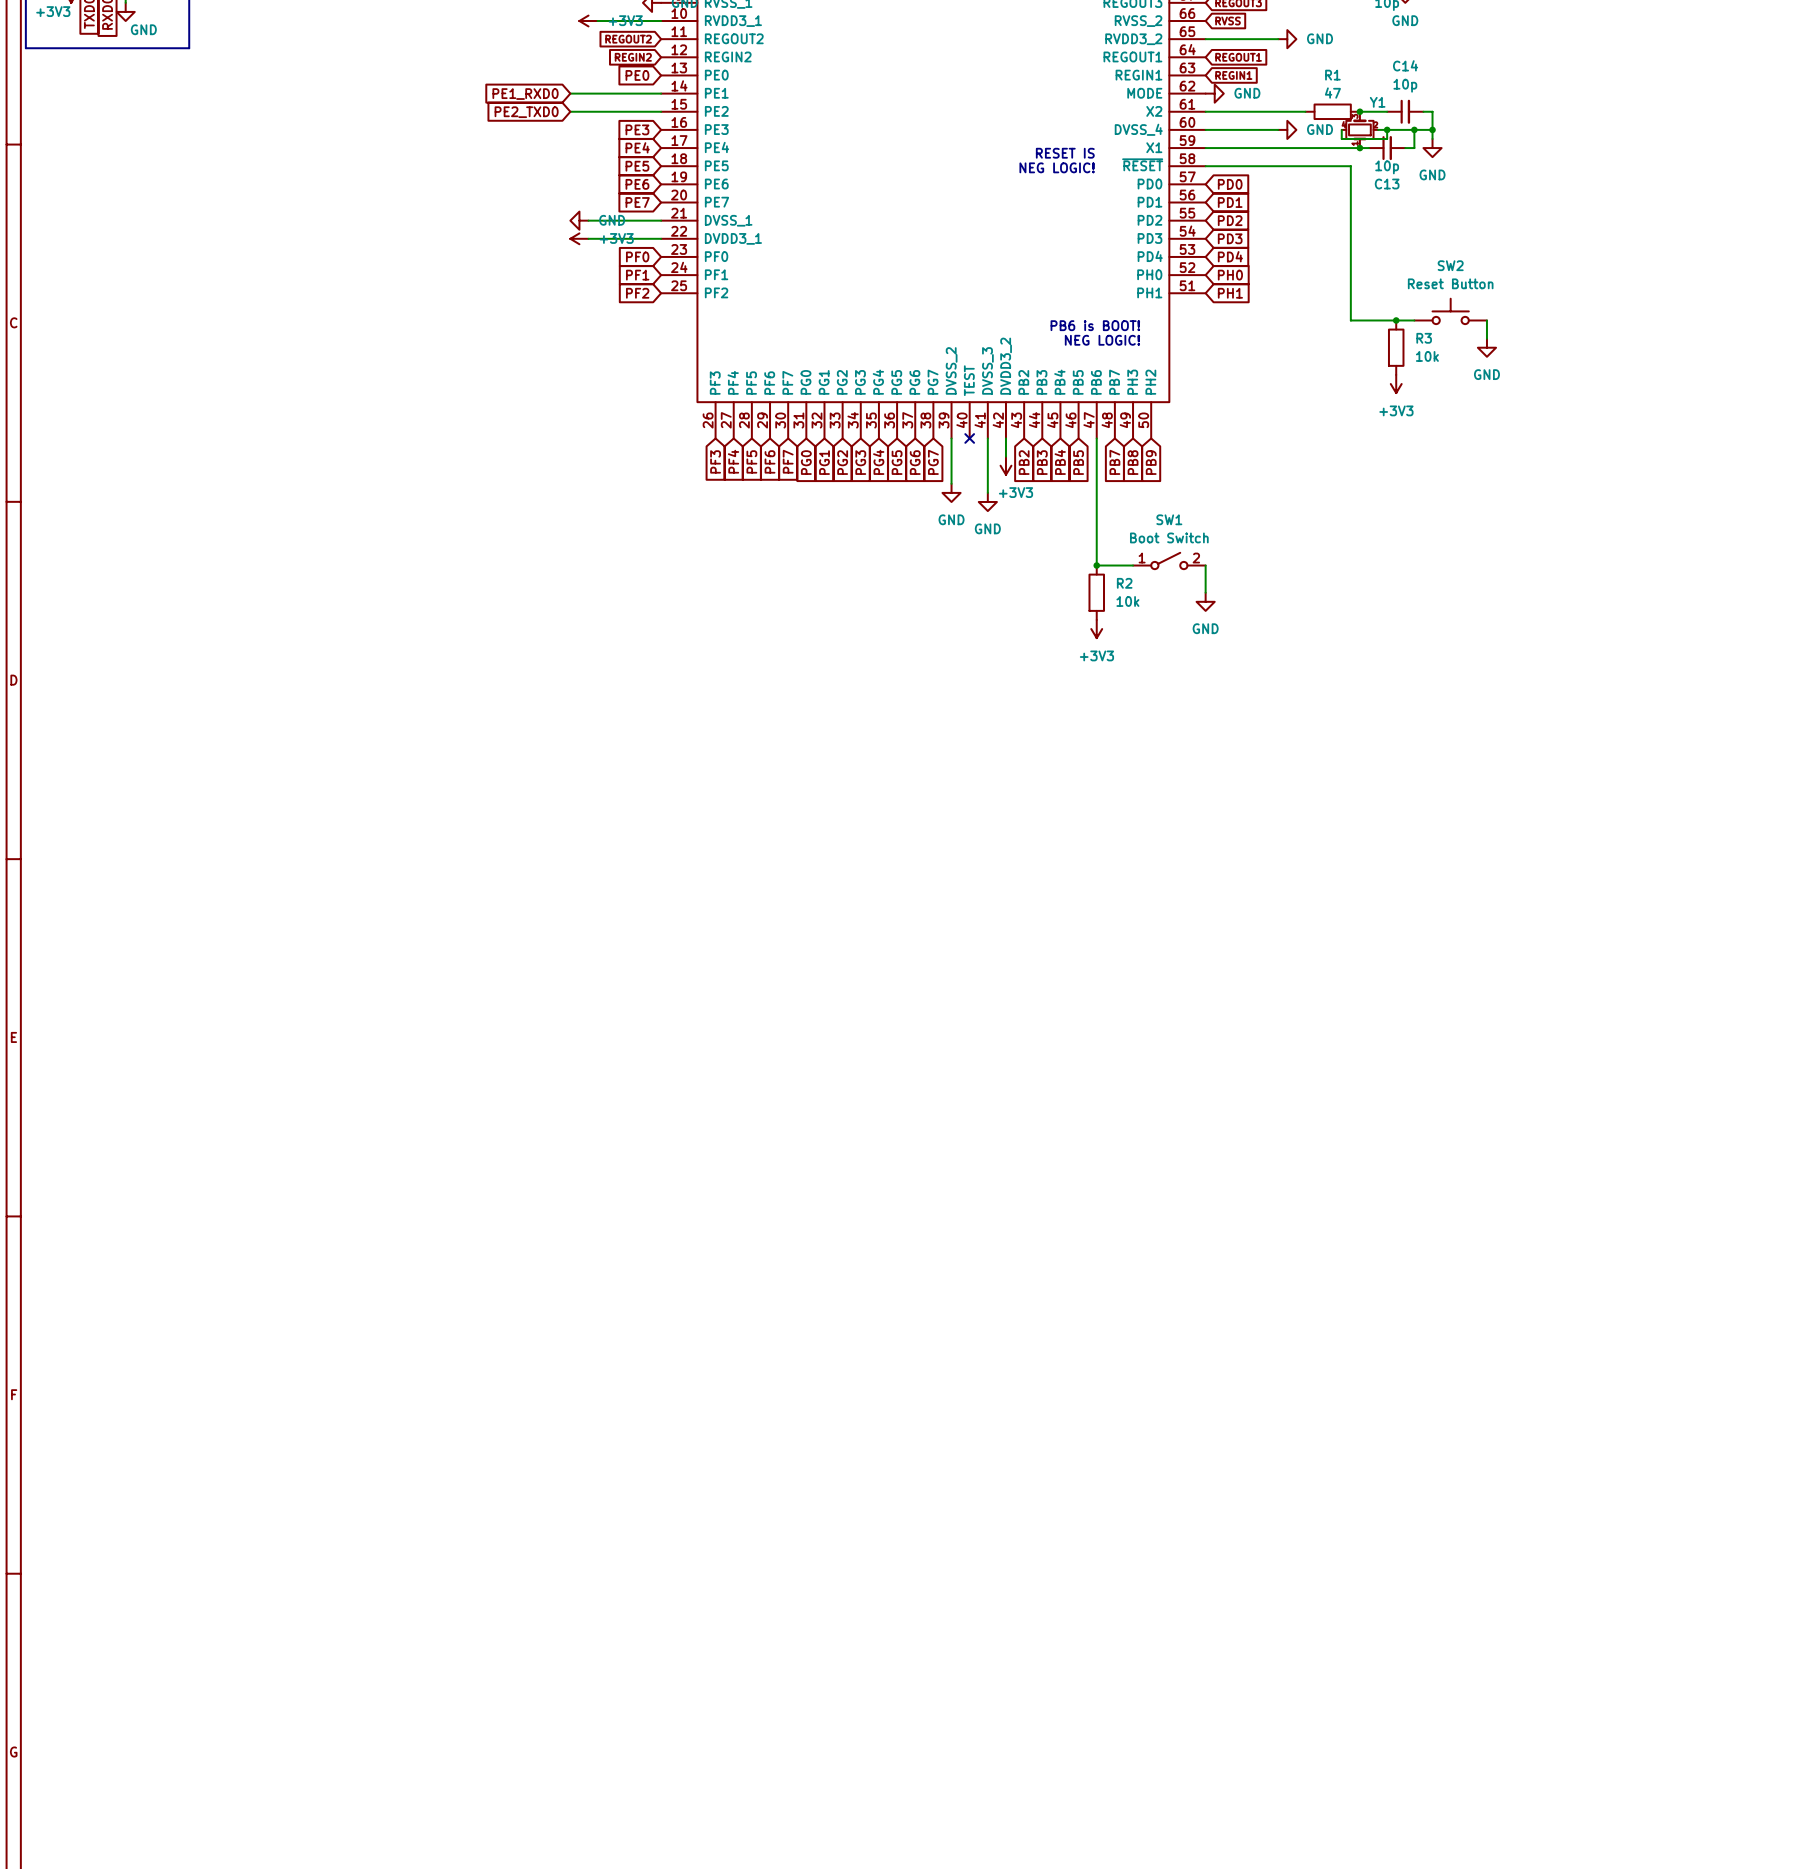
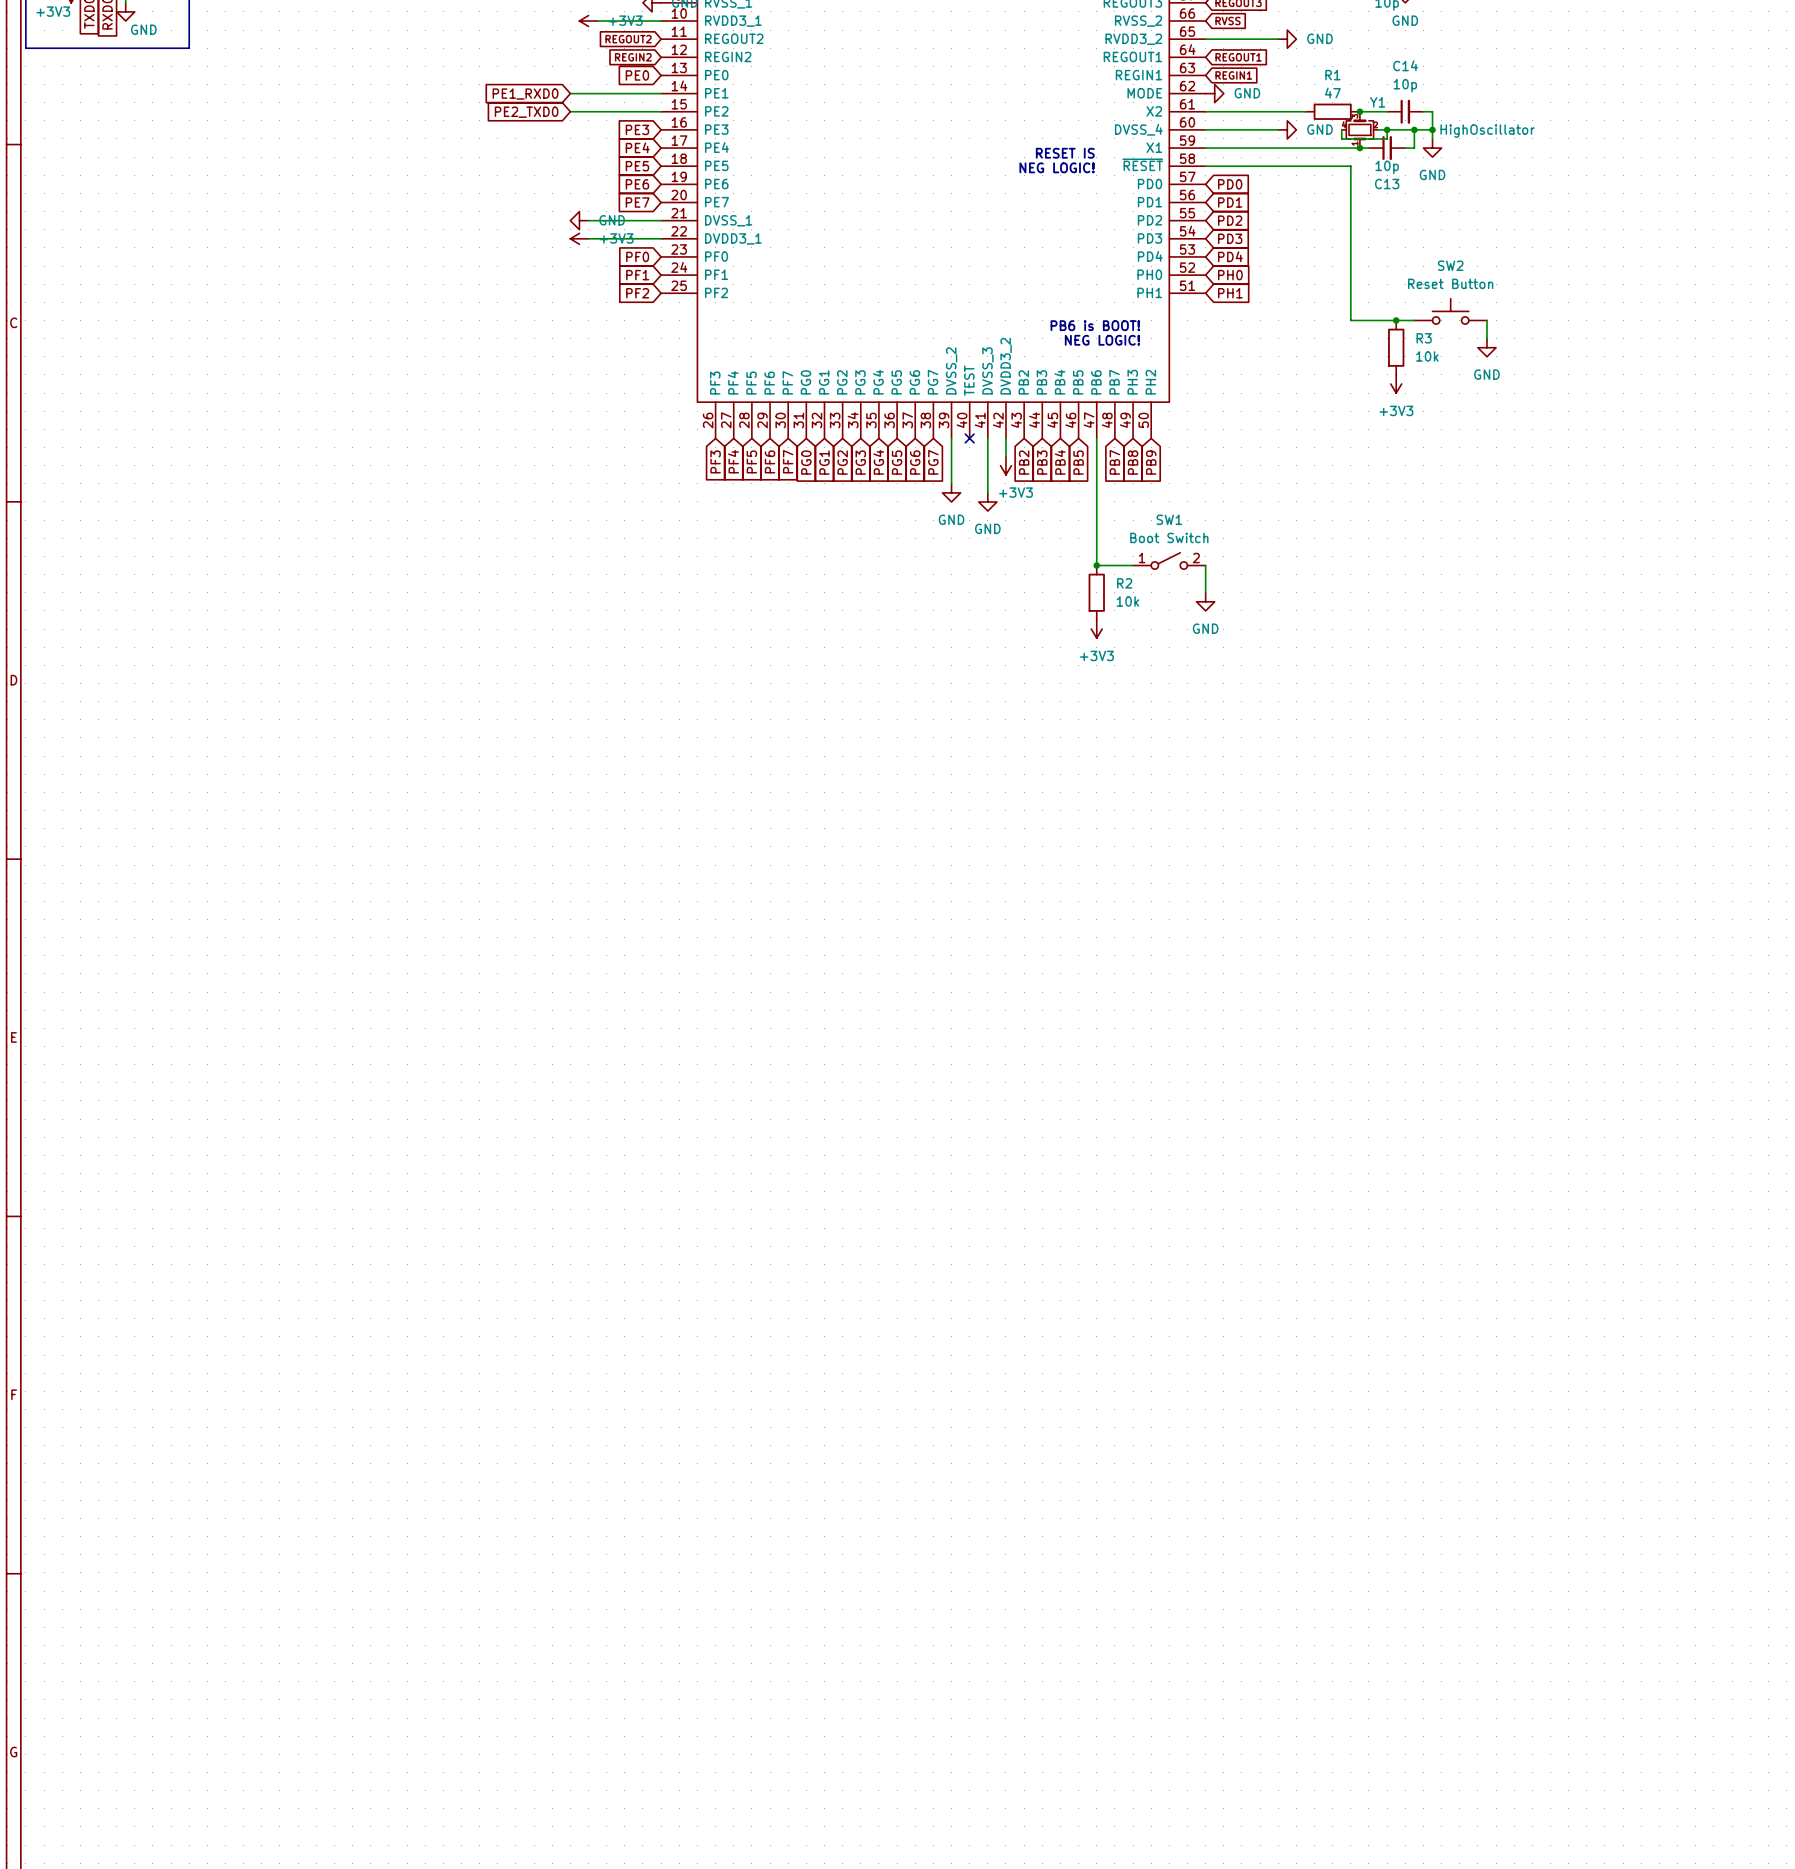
Y1 value: none -> HighOscillator (1487, 131)

